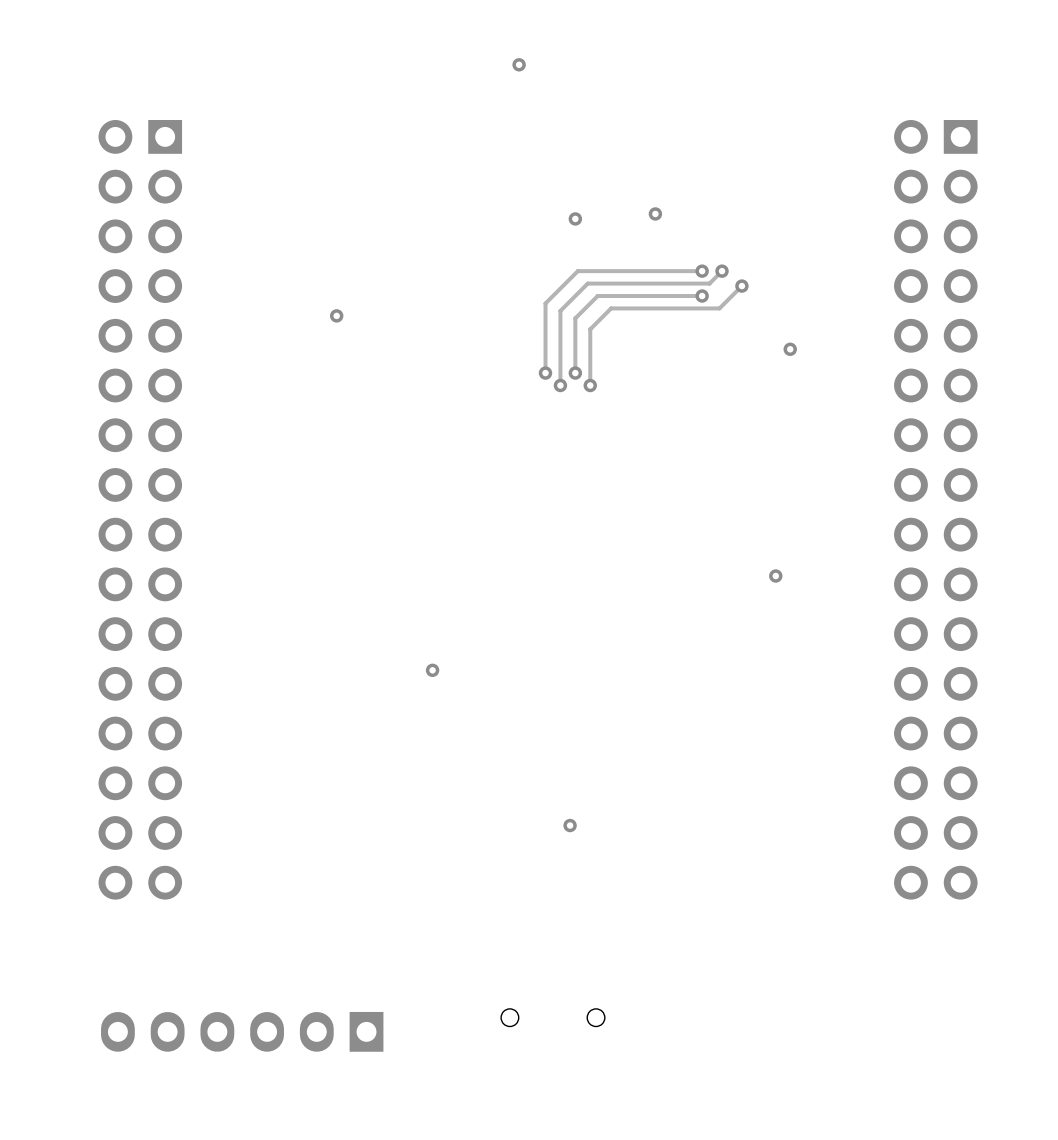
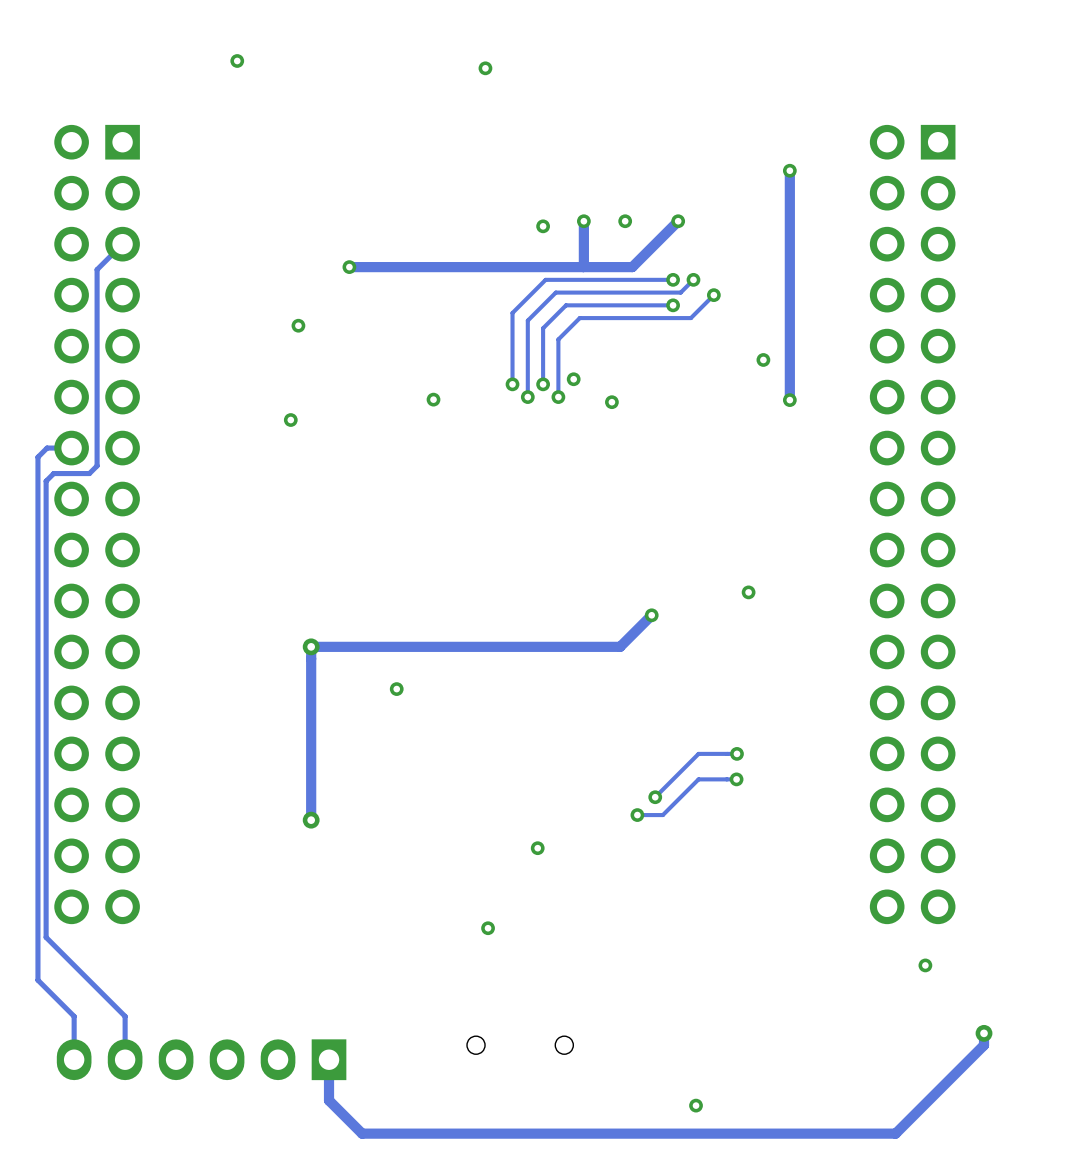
via: none -> (237, 60)
track: none -> (789, 170) (789, 400)
via: none -> (789, 170)
track: none -> (583, 221) (583, 267)
via: none -> (583, 221)
track: none -> (678, 221) (632, 267) (349, 267)
via: none -> (678, 221)
track: none -> (122, 244) (97, 269) (97, 465) (89, 473) (53, 473) (46, 481) (46, 937) (125, 1016) (125, 1059)
via: none -> (349, 267)
via: none -> (573, 379)
via: none -> (433, 399)
via: none -> (789, 400)
via: none -> (611, 402)
via: none -> (290, 420)
track: none -> (71, 448) (47, 448) (37, 457) (37, 980) (74, 1016) (74, 1059)
track: none -> (651, 615) (620, 646) (311, 646) (311, 820)
via: none -> (651, 615)
via: none -> (311, 646)
track: none -> (736, 753) (698, 753) (655, 797)
via: none -> (736, 753)
track: none -> (736, 779) (698, 779) (662, 815) (637, 815)
via: none -> (736, 779)
via: none -> (655, 797)
via: none -> (637, 815)
via: none -> (311, 820)
via: none -> (488, 928)
via: none -> (925, 965)
track: none -> (984, 1033) (984, 1045) (895, 1133) (362, 1133) (329, 1100) (329, 1059)
via: none -> (984, 1033)
via: none -> (696, 1105)

